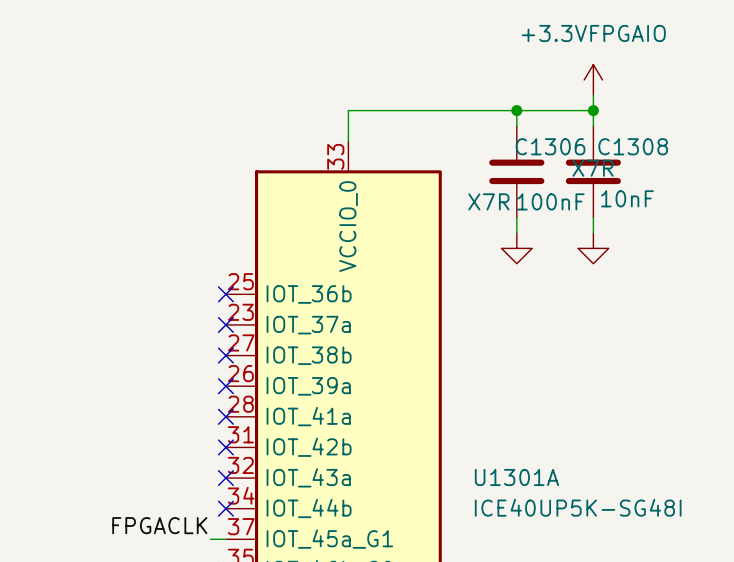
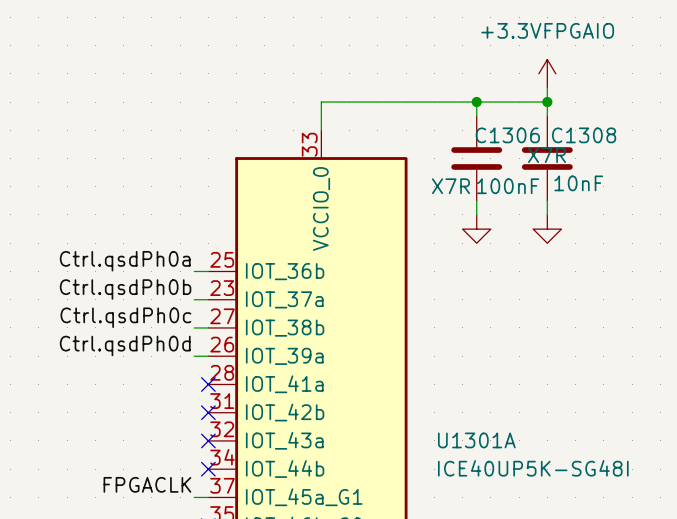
label: none -> Ctrl.qsdPh0a (125, 261)
wire: none -> (194, 271) (208, 271)
no-connect mark: (225, 294) -> none
label: none -> Ctrl.qsdPh0b (125, 289)
wire: none -> (194, 299) (208, 299)
no-connect mark: (225, 324) -> none
label: none -> Ctrl.qsdPh0c (125, 317)
wire: none -> (194, 327) (208, 327)
no-connect mark: (225, 355) -> none
label: none -> Ctrl.qsdPh0d (125, 345)
wire: none -> (194, 356) (208, 356)
no-connect mark: (225, 386) -> none

